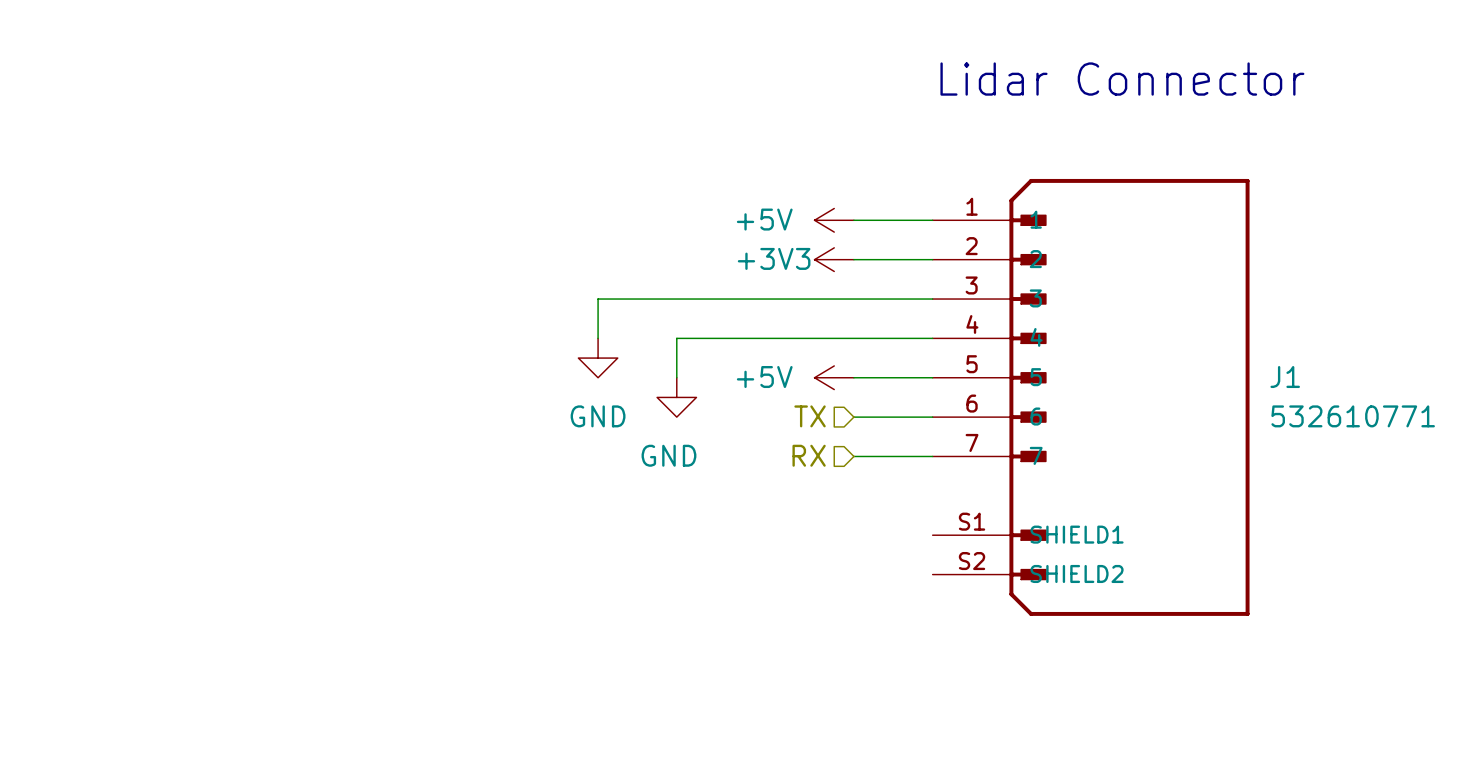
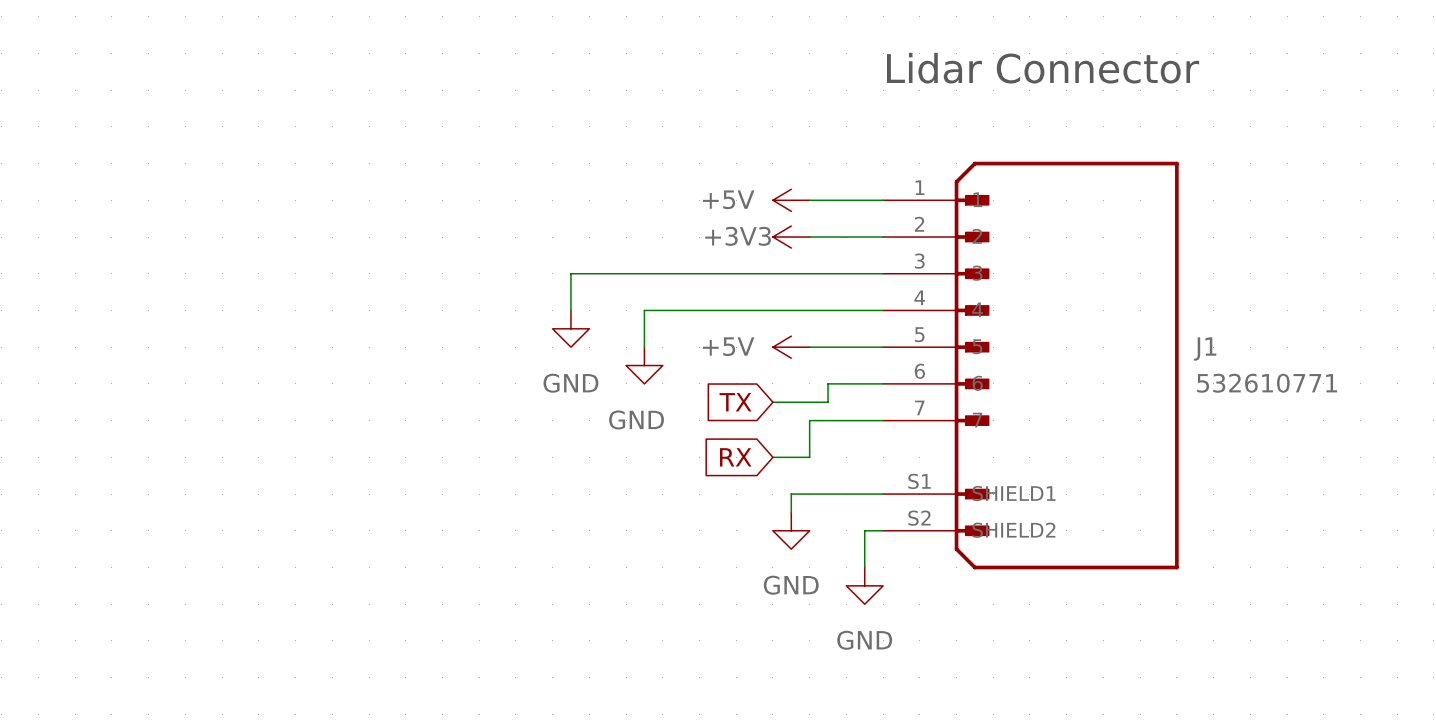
hierarchical label: TX (810, 416) -> none
wire: (853, 417) (873, 417) -> (772, 402) (828, 402) (828, 383)
global label: none -> TX (735, 402)
hierarchical label: RX (809, 455) -> none
wire: none -> (809, 420) (809, 457) (772, 457)
global label: none -> RX (735, 457)
wire: none -> (883, 494) (791, 494) (791, 512)
power symbol: none -> GND (791, 530)
wire: none -> (883, 530) (864, 530) (864, 567)
power symbol: none -> GND (864, 585)

